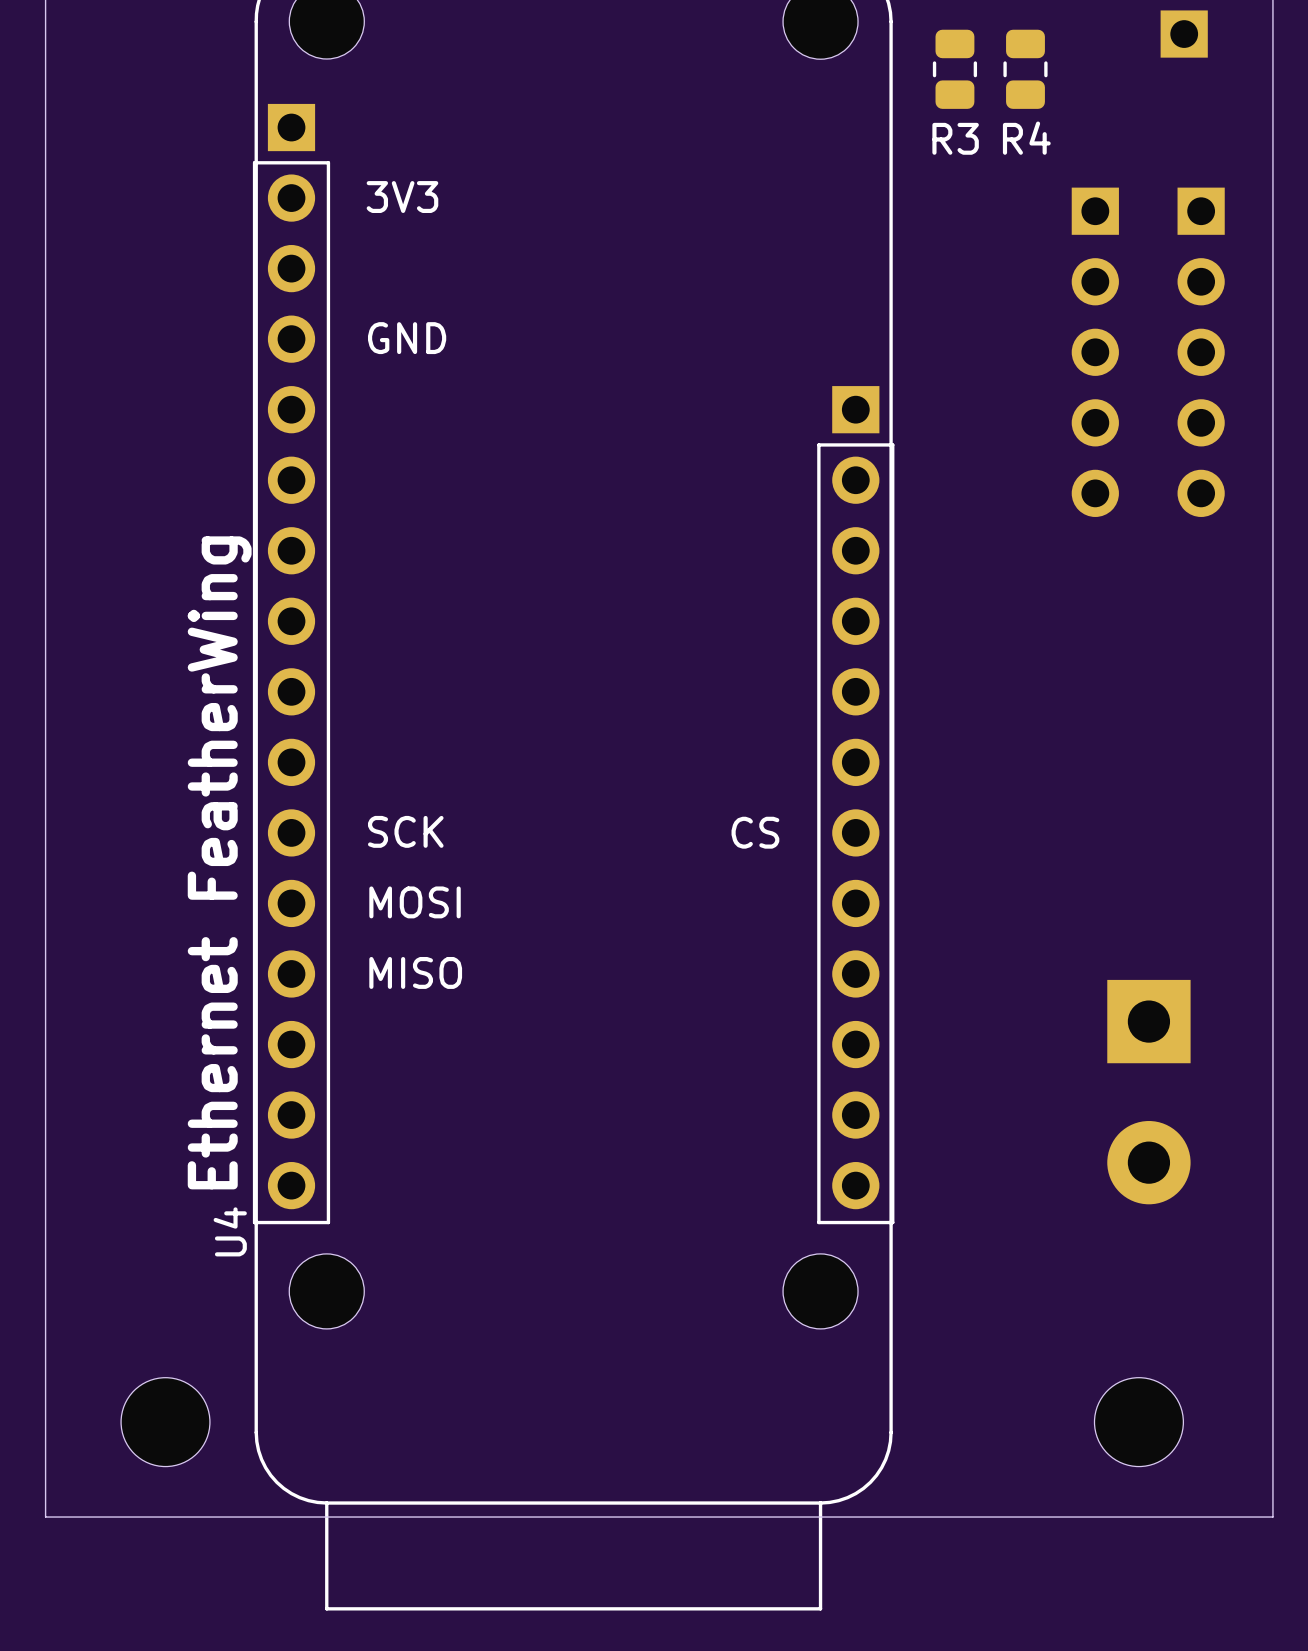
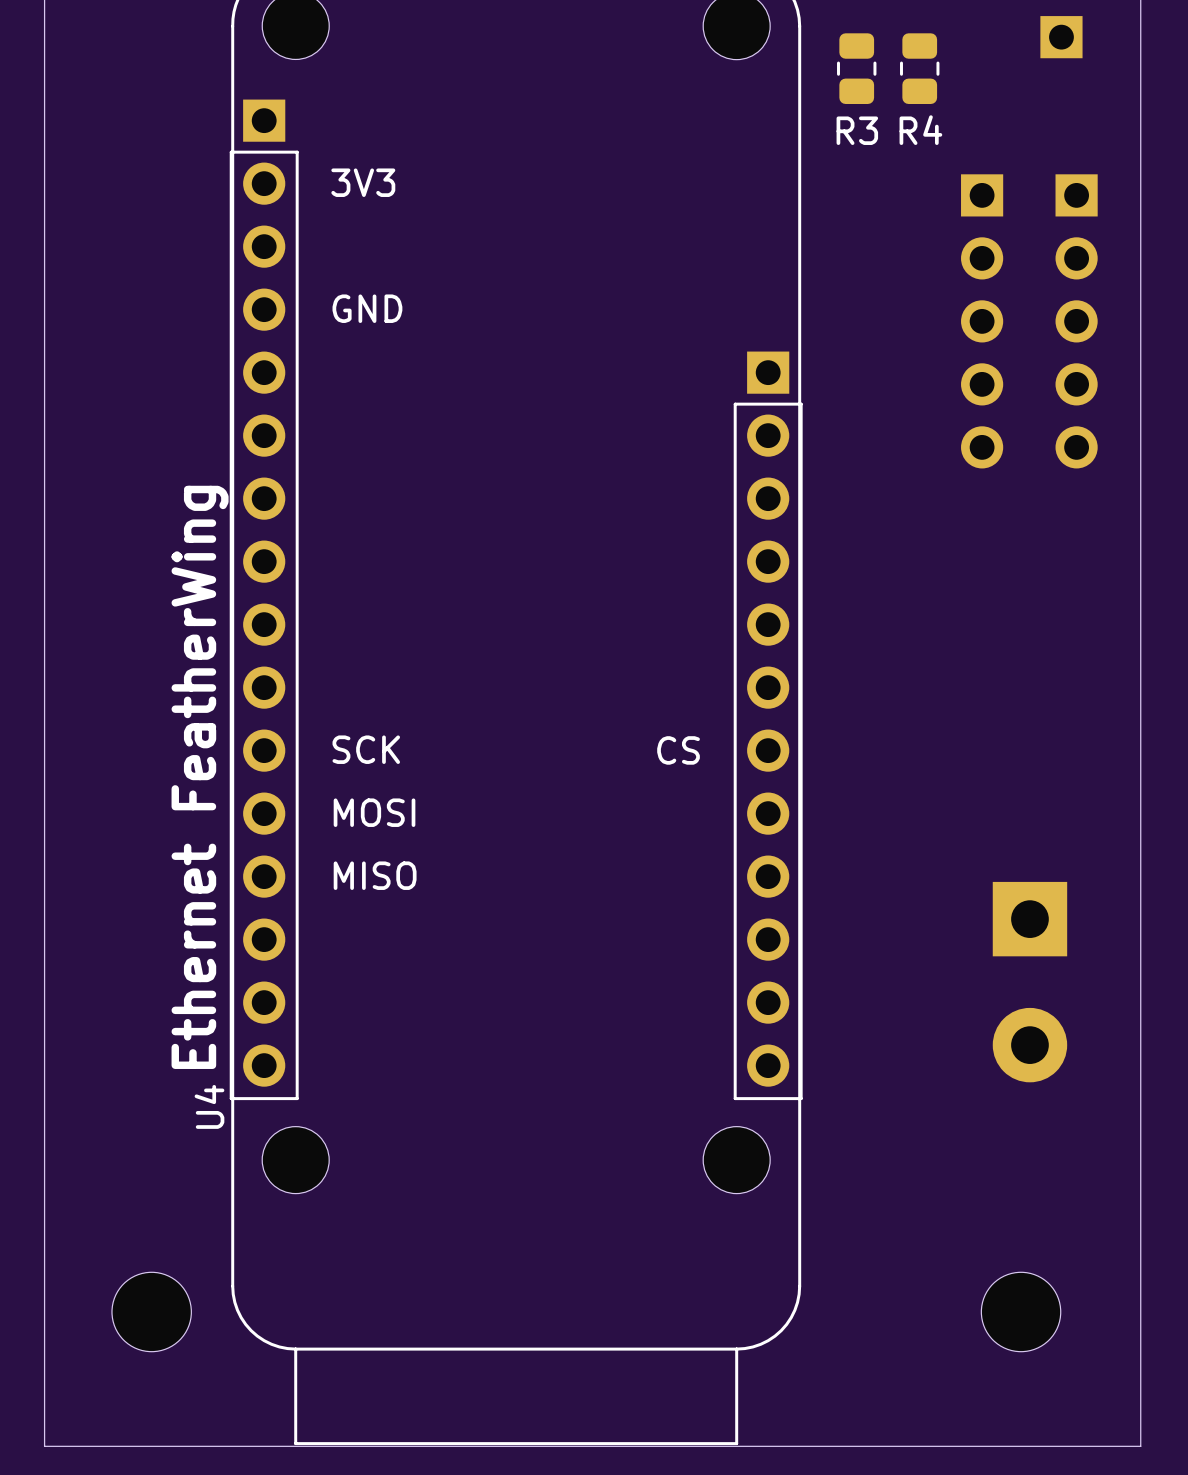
part position: (165, 1422) -> (151, 1311)
part position: (1138, 1422) -> (1021, 1311)
board edge: (1272, 1517) (45, 1517) -> (1140, 1361) (1140, 1446) (44, 1446) (44, 1361)

